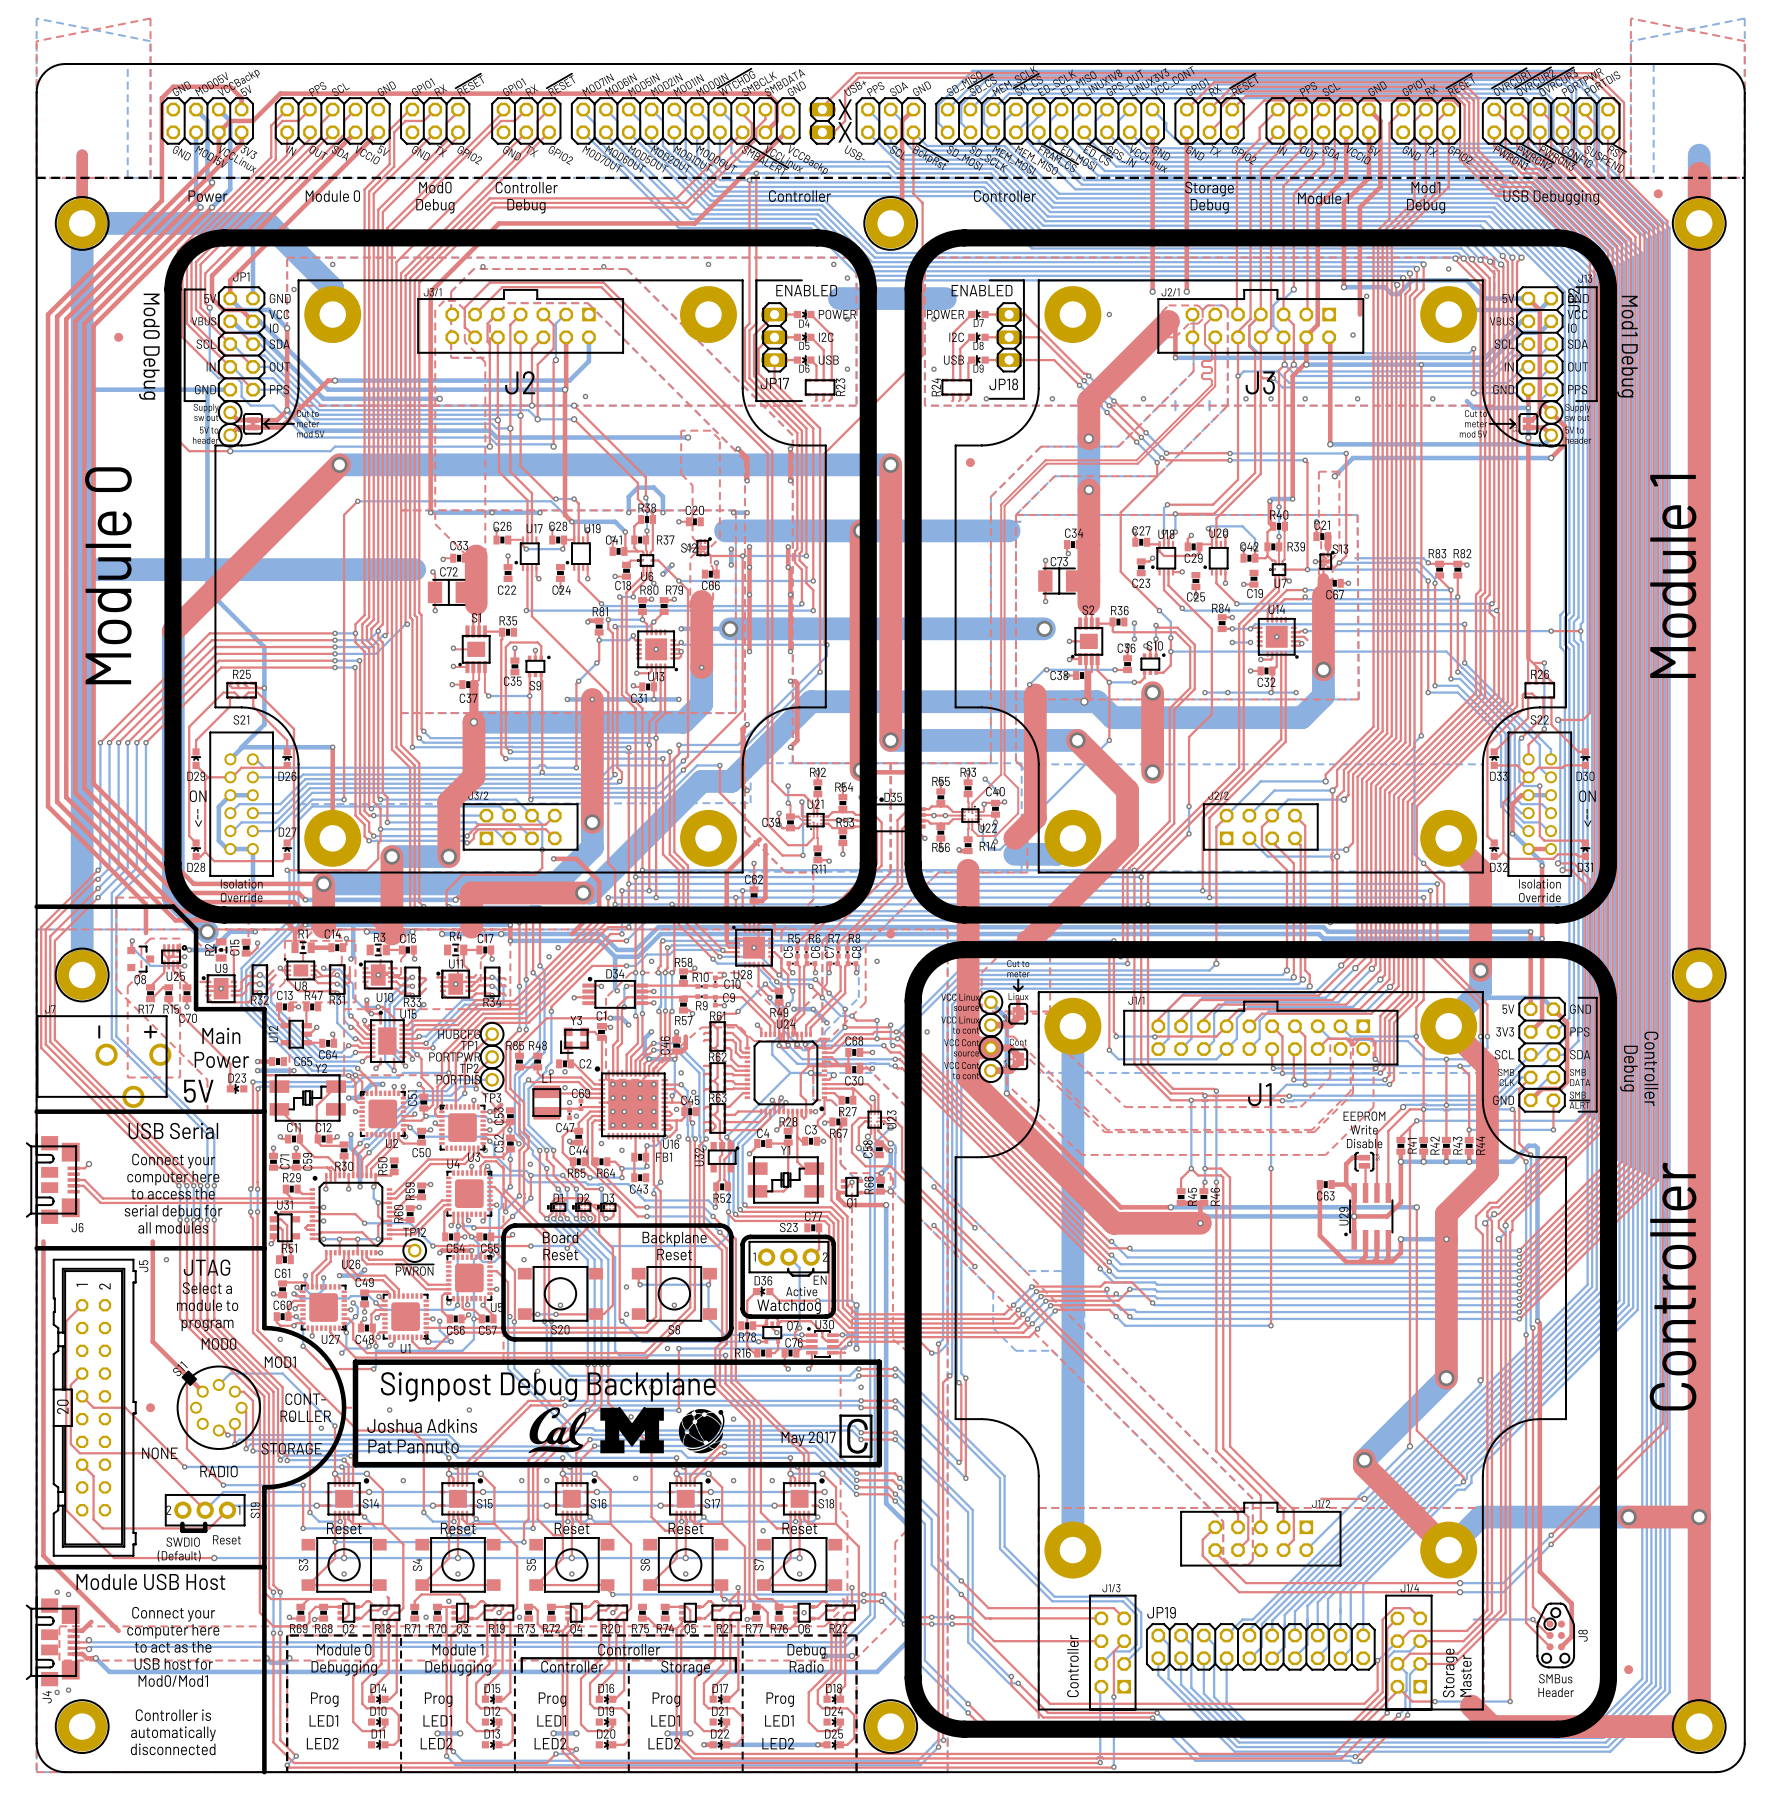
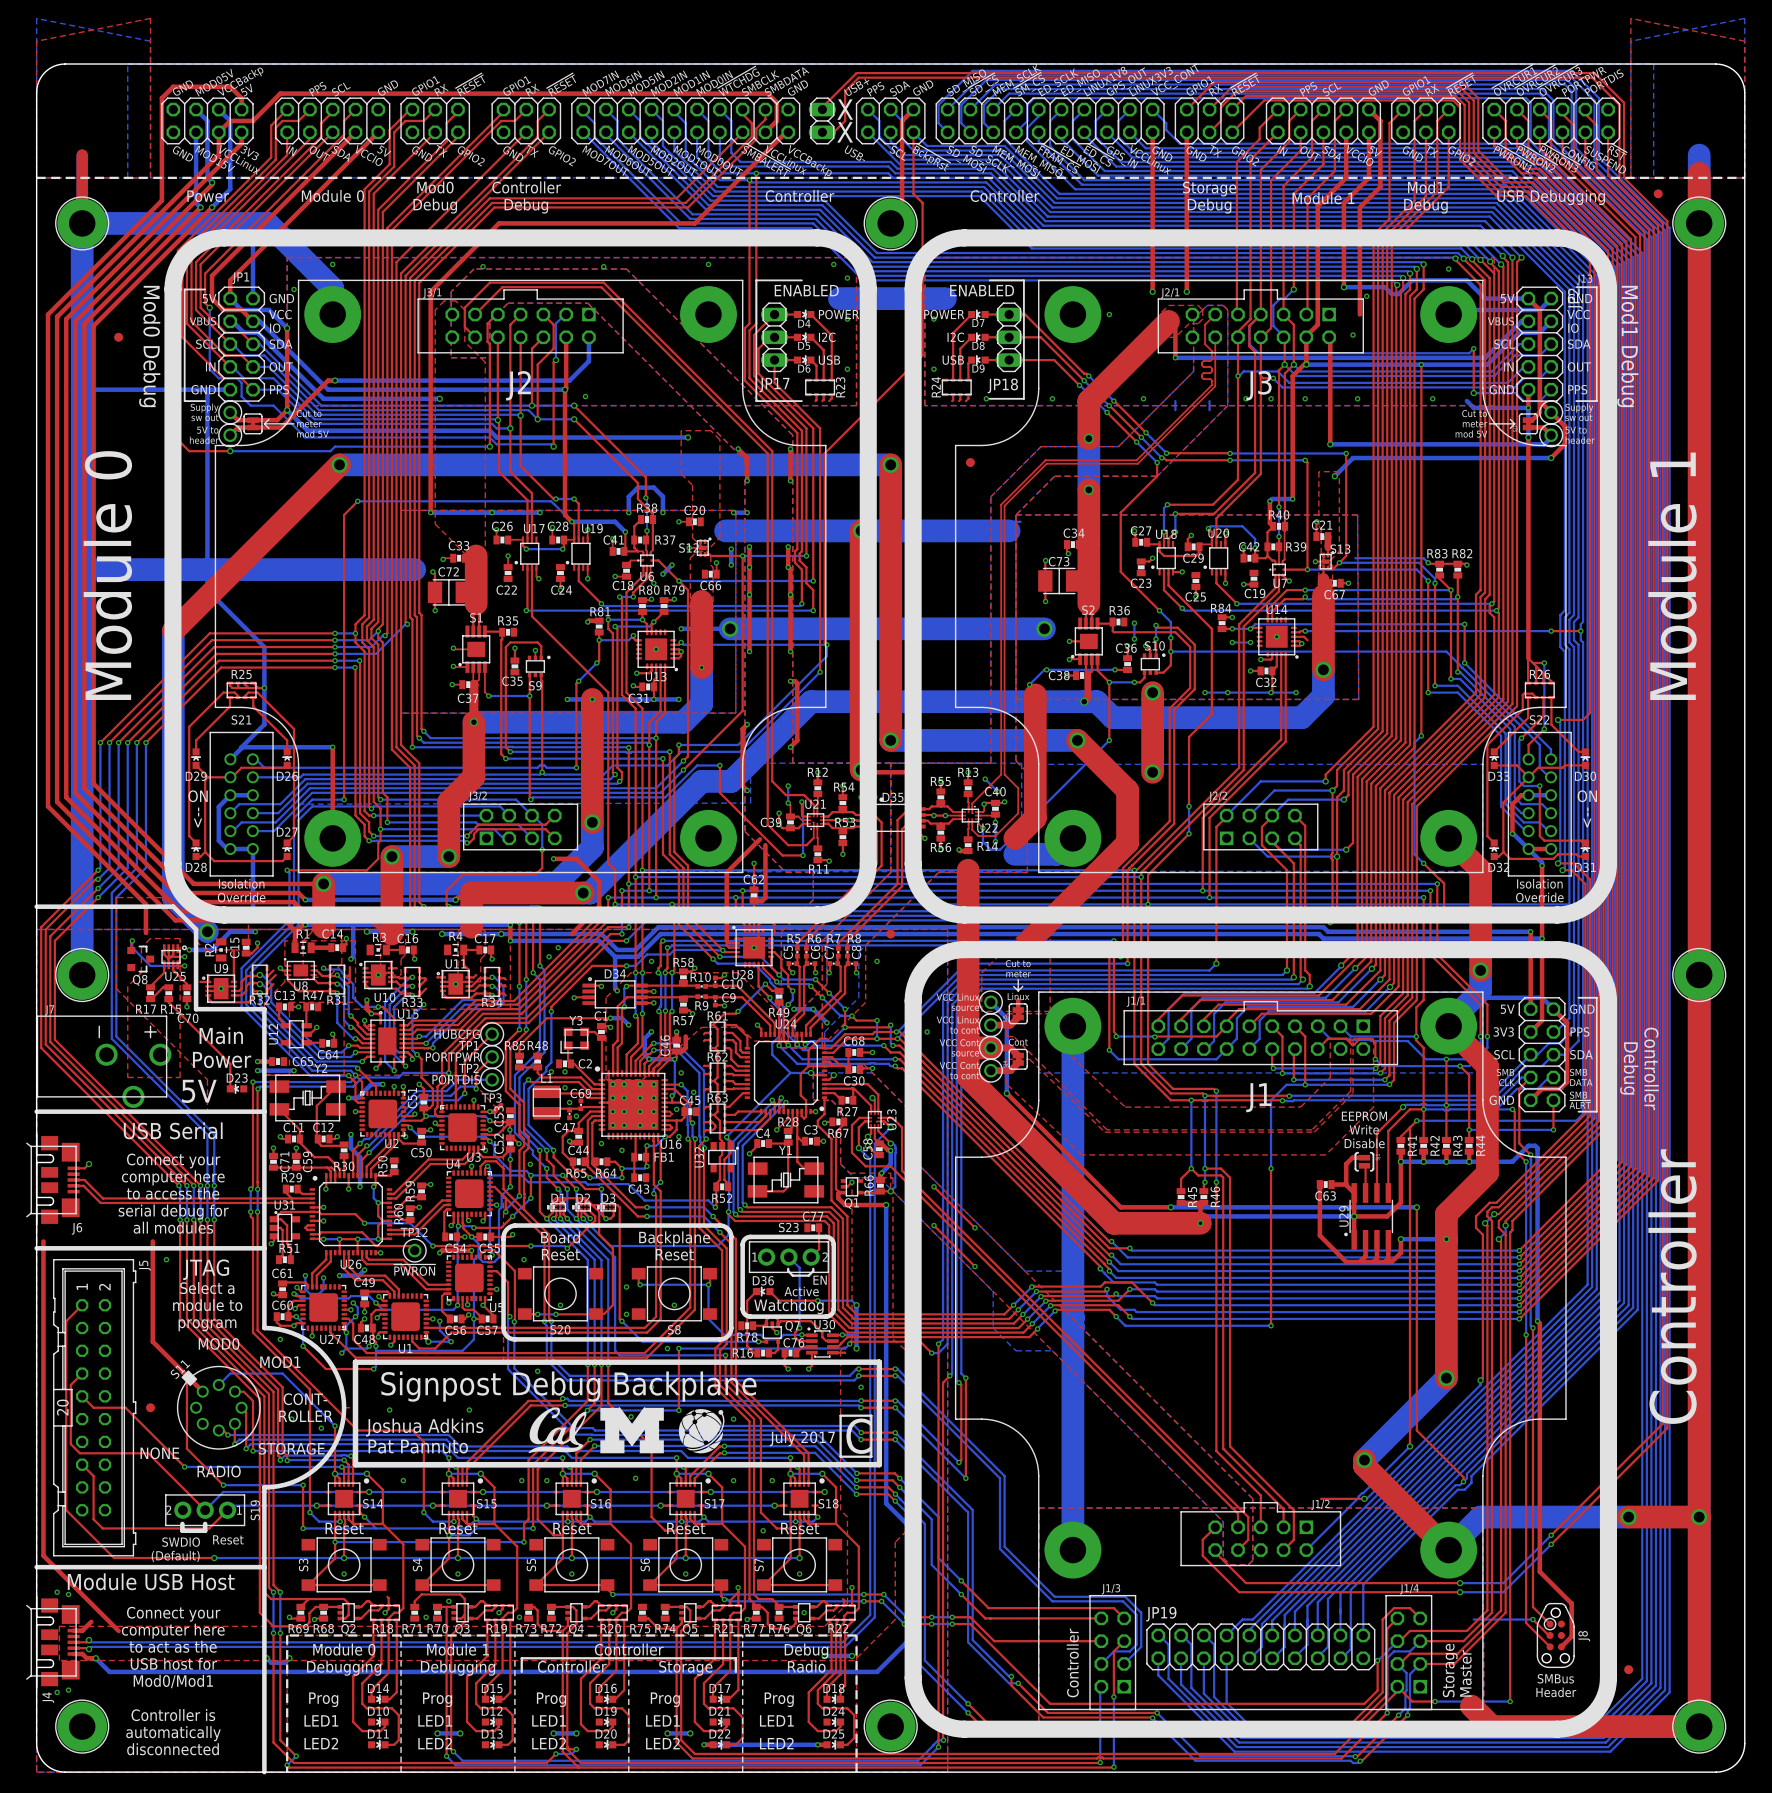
text: May 2017 (808, 1438) -> July 2017 (802, 1438)

